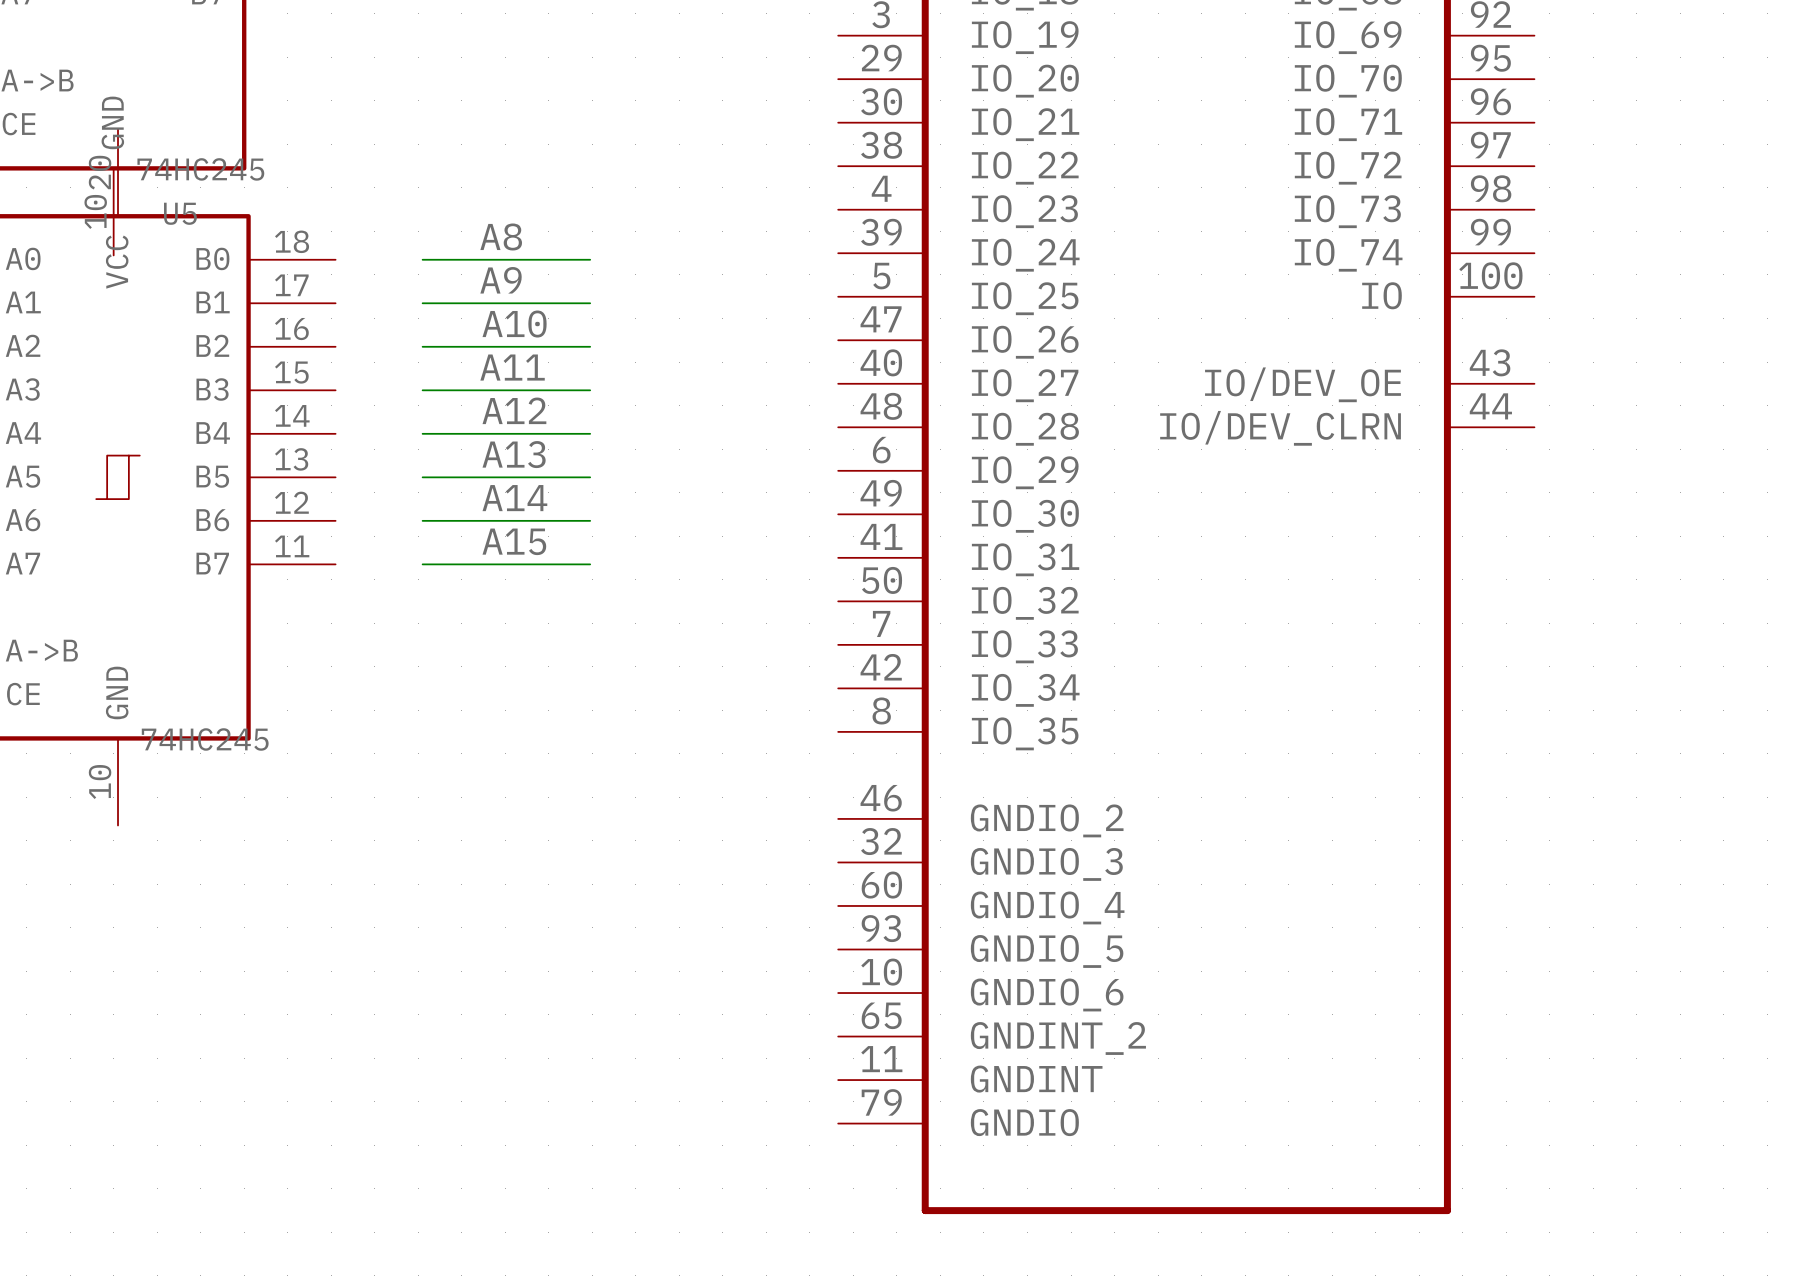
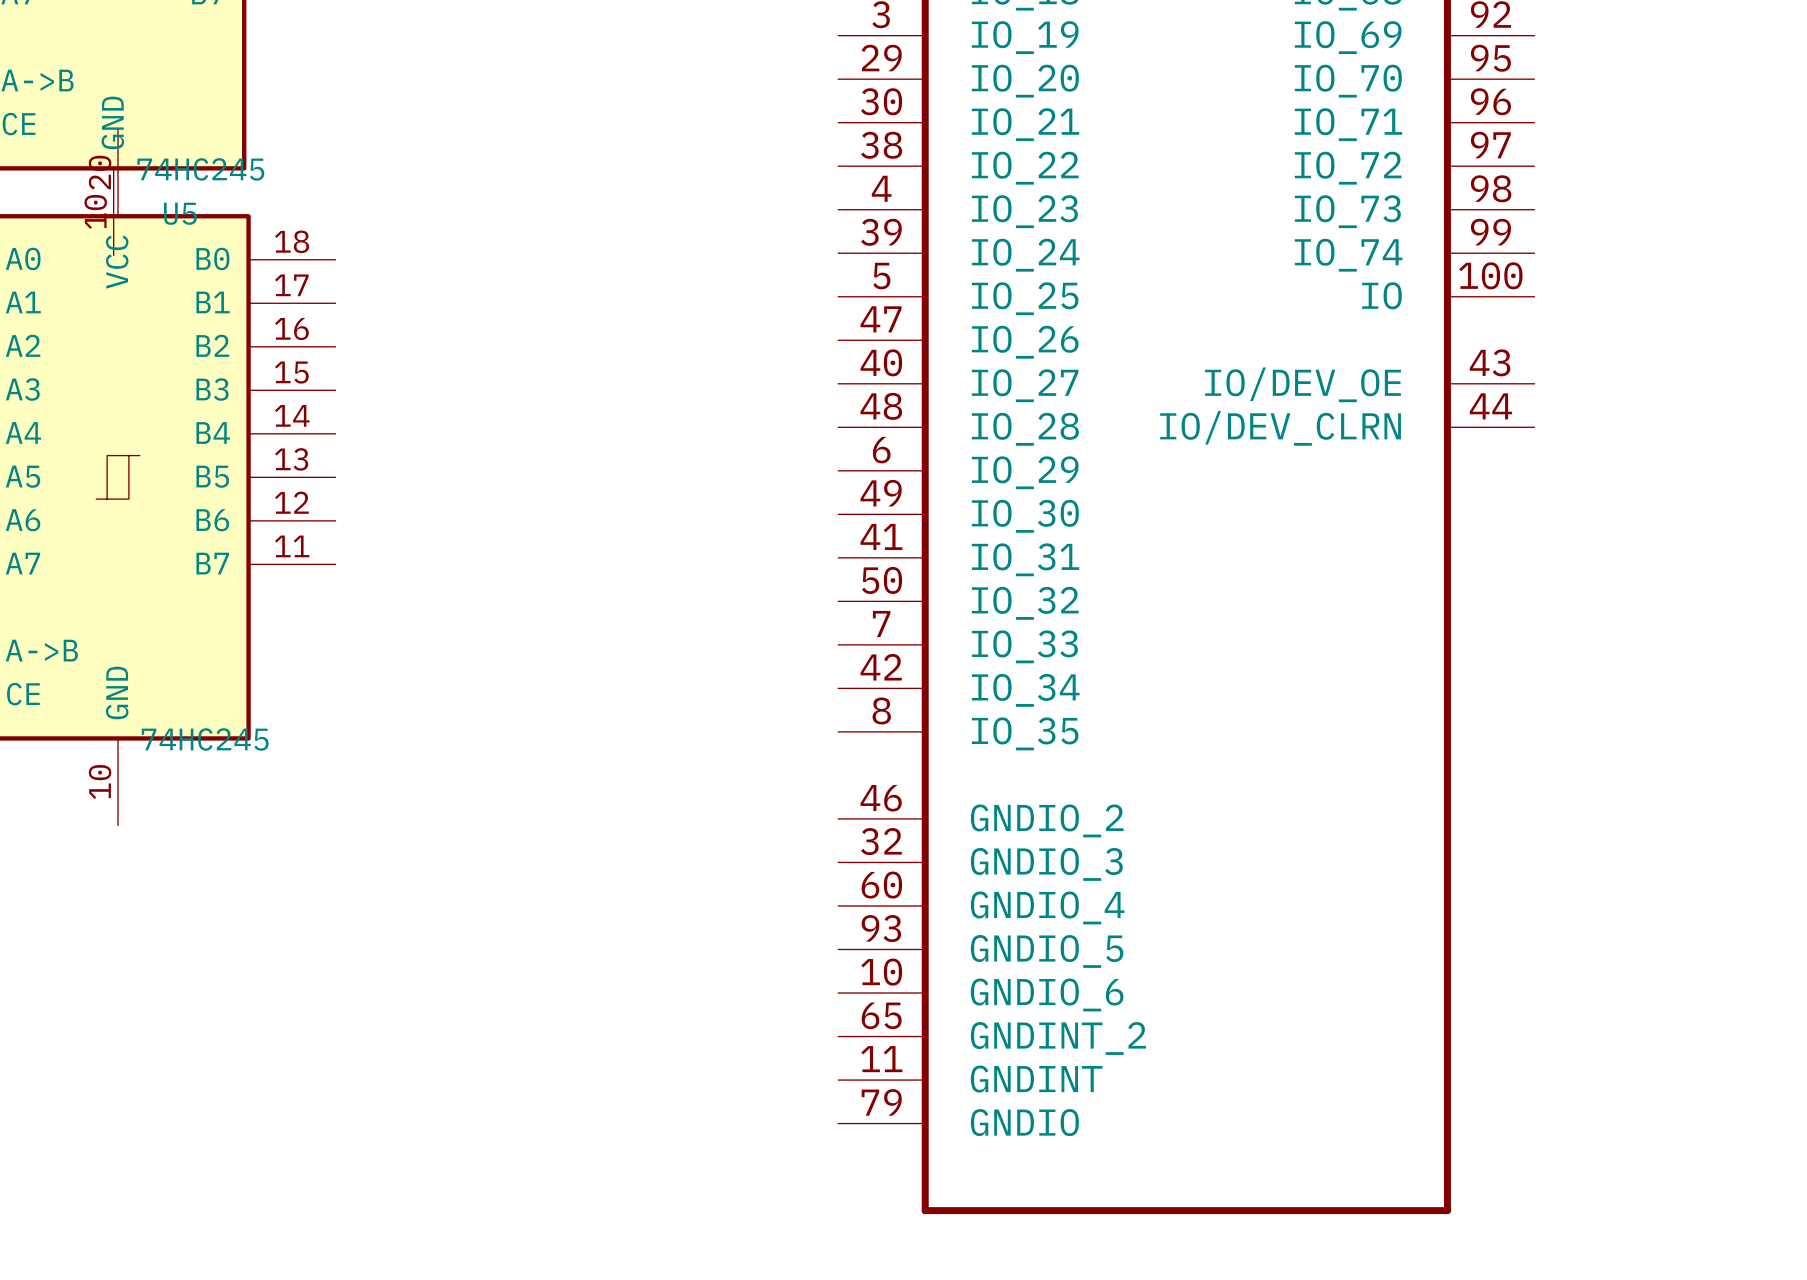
label: A8 (501, 236) -> none
wire: (422, 259) (590, 259) -> none
label: A9 (501, 280) -> none
wire: (422, 303) (590, 303) -> none
label: A10 (514, 324) -> none
wire: (422, 346) (590, 346) -> none
label: A11 (512, 367) -> none
wire: (422, 390) (590, 390) -> none
label: A12 (514, 410) -> none
wire: (422, 433) (590, 433) -> none
label: A13 (514, 454) -> none
wire: (422, 477) (590, 477) -> none
label: A14 (514, 498) -> none
wire: (422, 520) (590, 520) -> none
label: A15 (514, 541) -> none
wire: (422, 564) (590, 564) -> none

